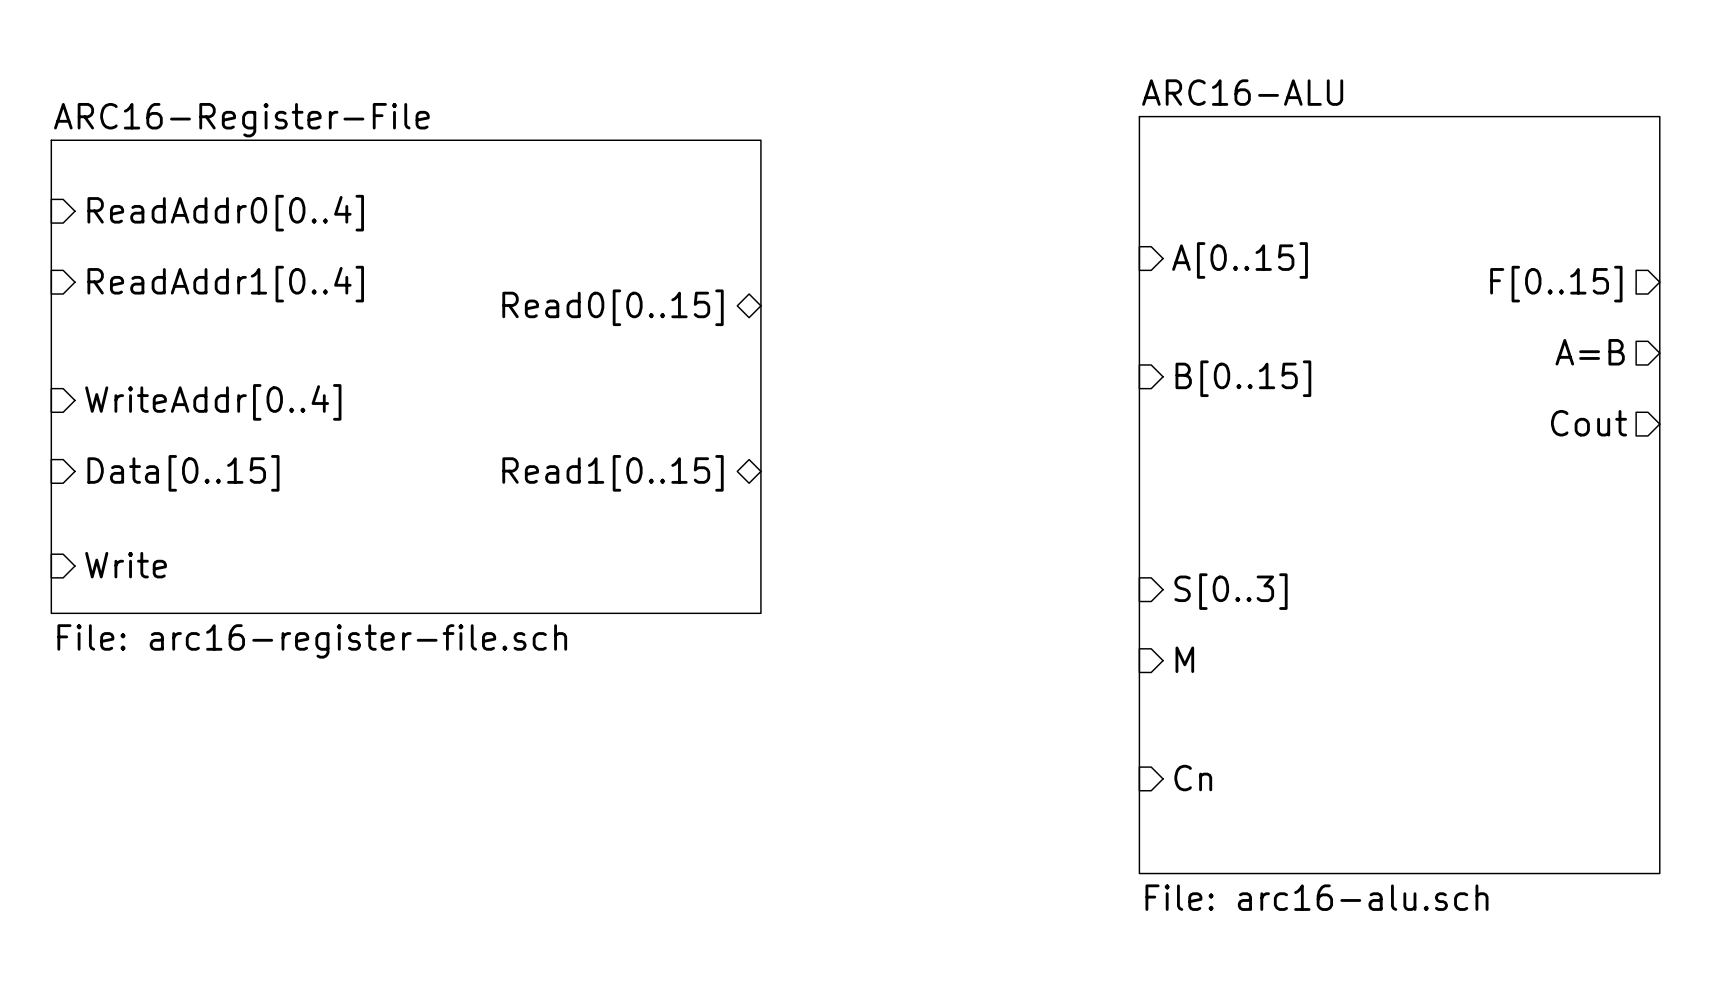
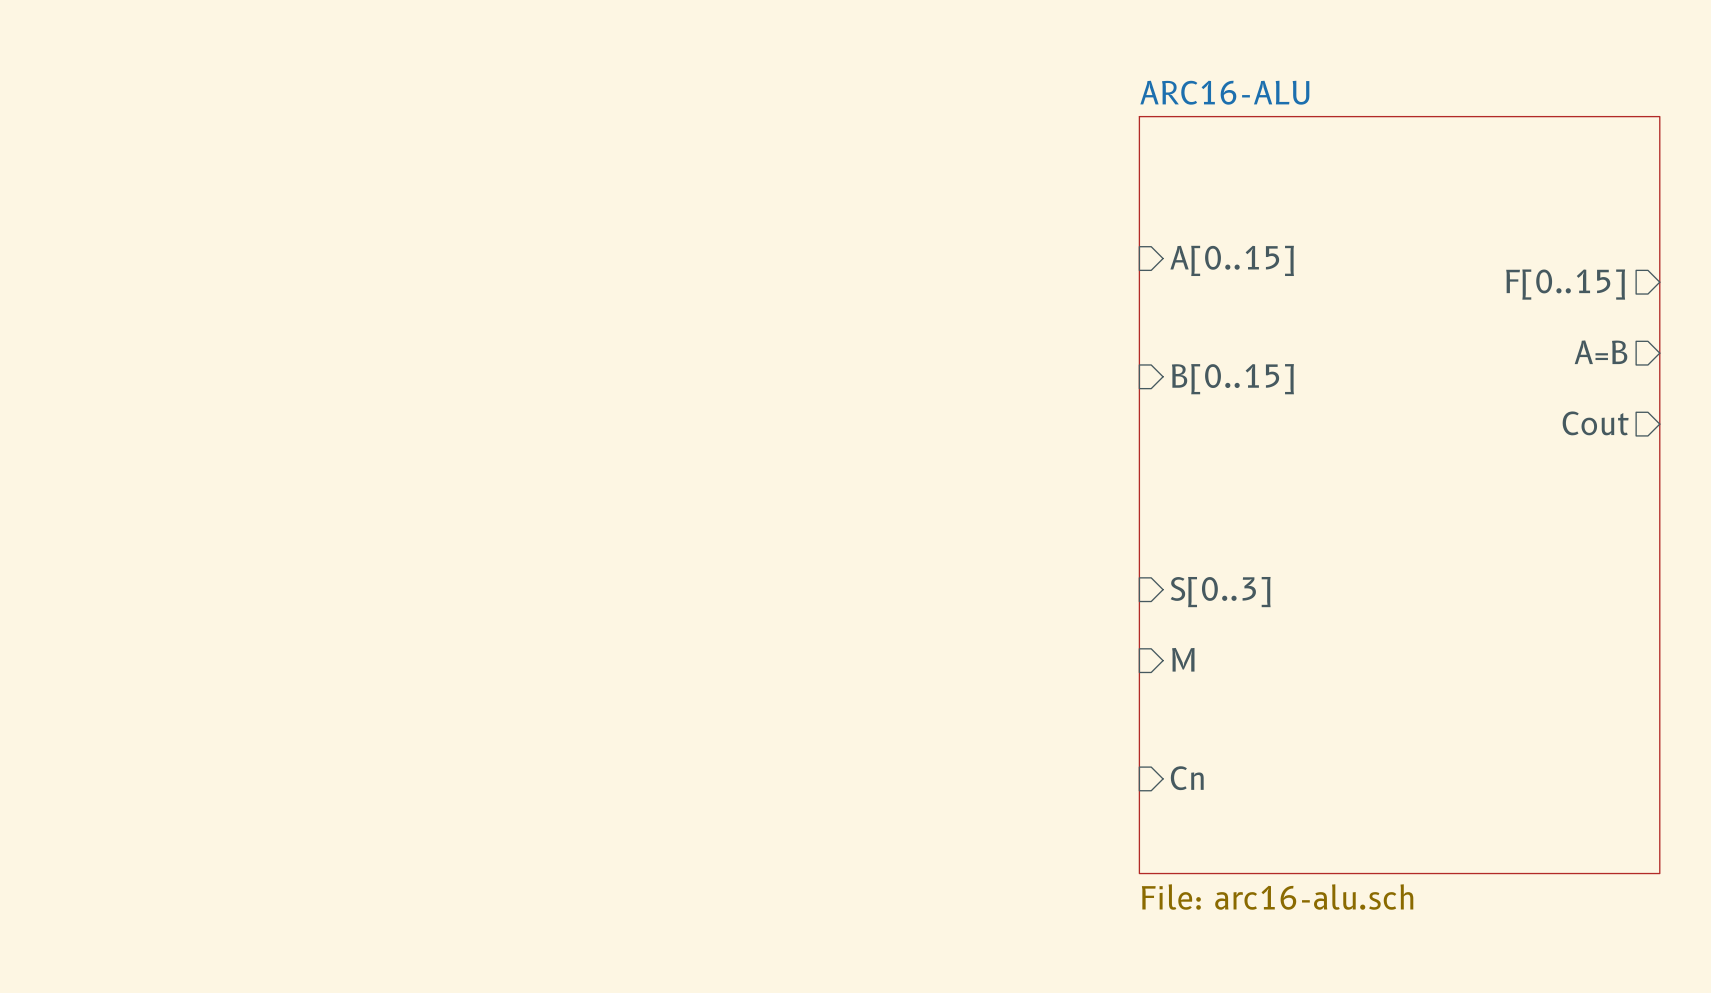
sheet pin: ReadAddr0[0..4] (225, 213) -> none
sheet pin: ReadAddr1[0..4] (225, 284) -> none
sheet pin: Read0[0..15] (613, 307) -> none
sheet ARC16-Register-File: File: arc16-register-file.sch (406, 376) -> none
sheet pin: WriteAddr[0..4] (213, 402) -> none
sheet pin: Data[0..15] (183, 473) -> none
sheet pin: Read1[0..15] (613, 473) -> none
sheet pin: Write (126, 565) -> none

